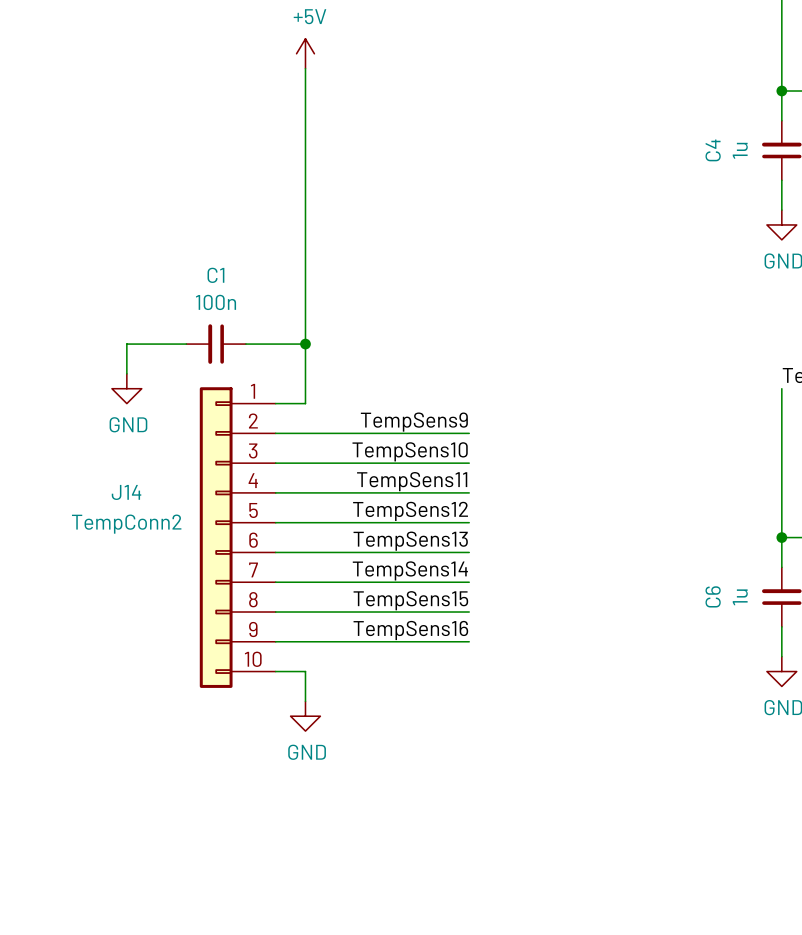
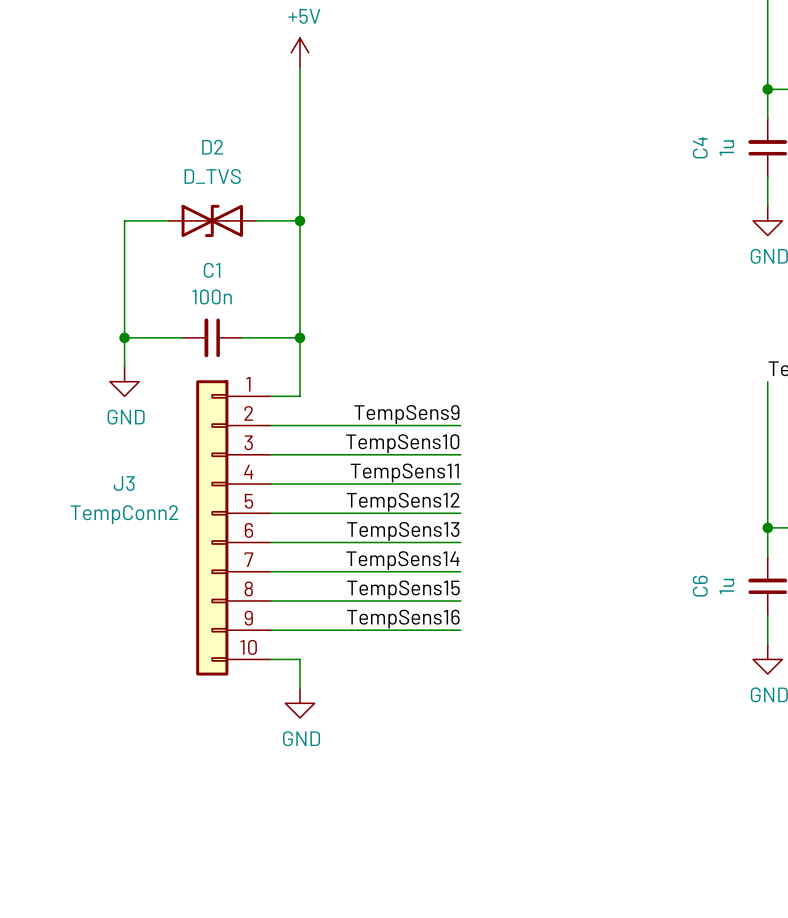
wire: none -> (168, 220) (124, 220) (124, 337)
D2: none -> D_TVS (212, 220)
wire: none -> (256, 220) (299, 220)
junction: none -> (299, 220)
junction: none -> (124, 337)
J14 name: J14 (126, 492) -> J3 (124, 483)

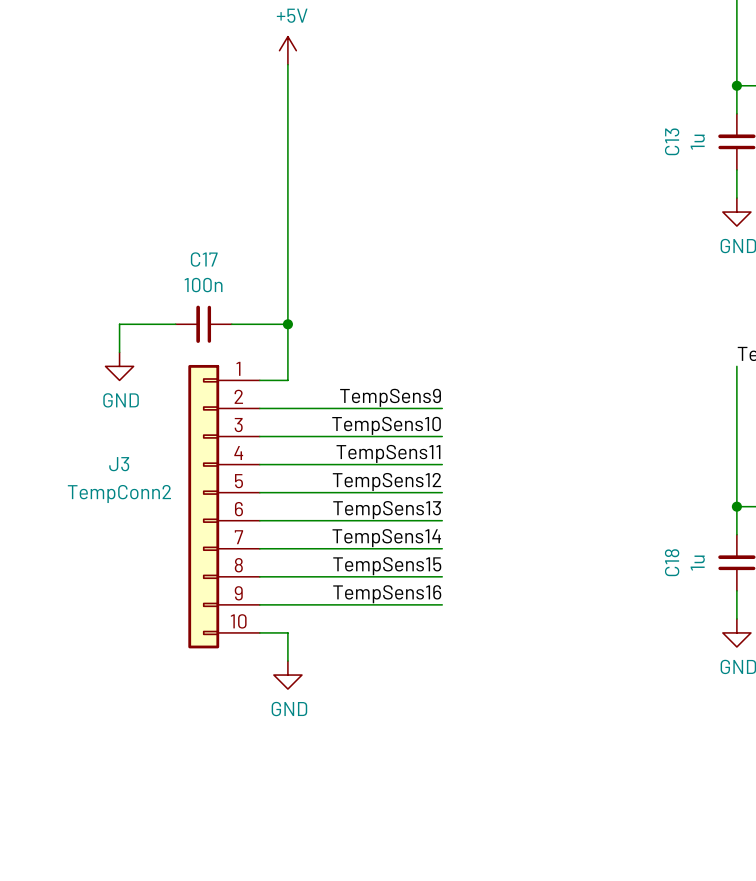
C4 name: C4 (700, 147) -> C13 (672, 141)
wire: (168, 220) (124, 220) (124, 337) -> none
D2: D_TVS (212, 220) -> none
wire: (256, 220) (299, 220) -> none
junction: (299, 220) -> none
C1 name: C1 (212, 270) -> C17 (204, 259)
junction: (124, 337) -> none
C6 name: C6 (700, 586) -> C18 (672, 562)

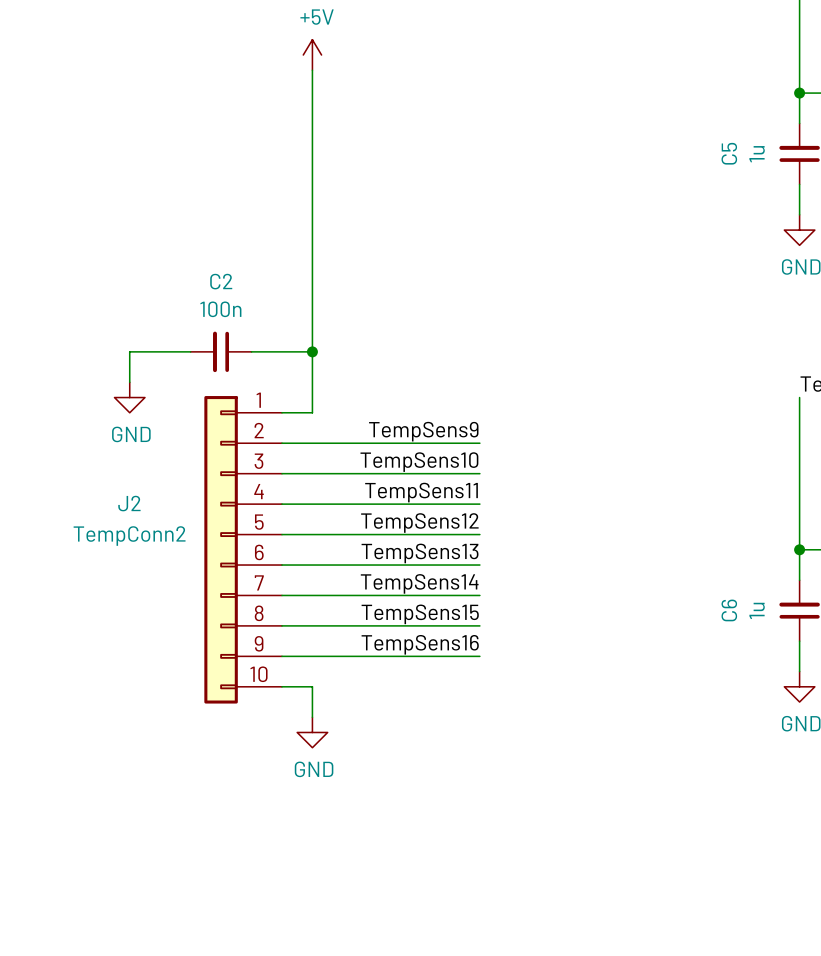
C13 name: C13 (672, 141) -> C5 (729, 153)
C17 name: C17 (204, 259) -> C2 (221, 281)
J3 name: J3 (119, 464) -> J2 (129, 503)
C18 name: C18 (672, 562) -> C6 (729, 610)

